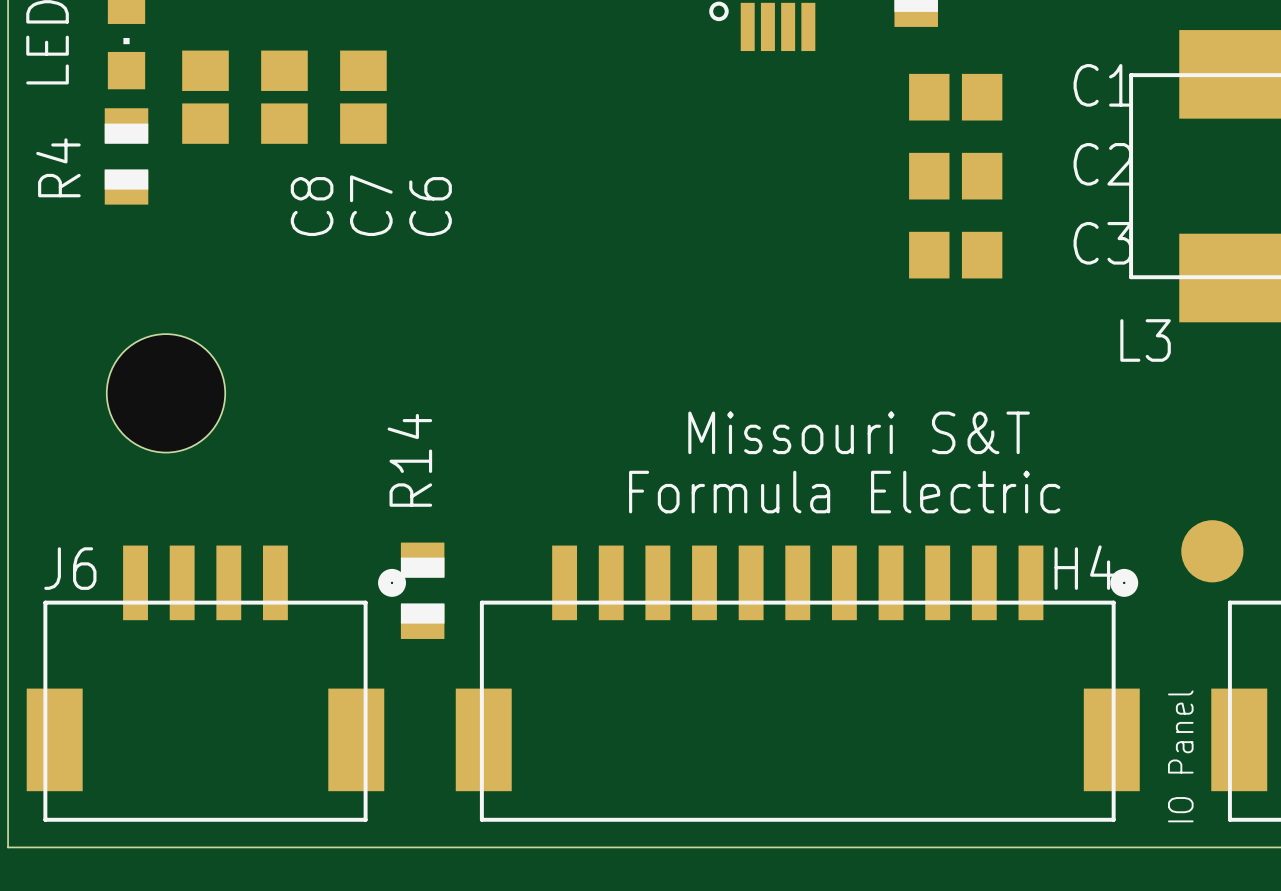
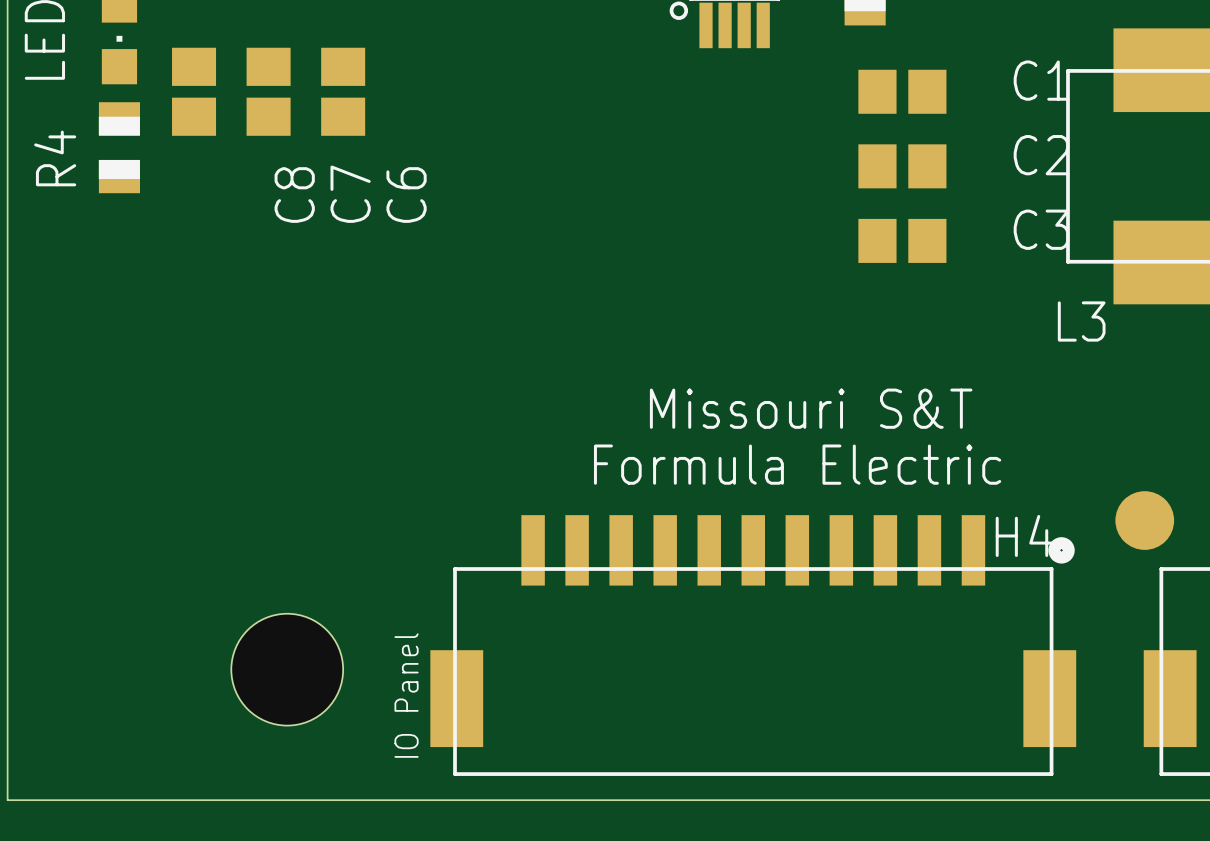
hole position: (166, 393) -> (287, 669)
R14: (422, 590) -> none
J6: (216, 683) -> none
text position: IO Panel (1180, 756) -> IO Panel (406, 695)

